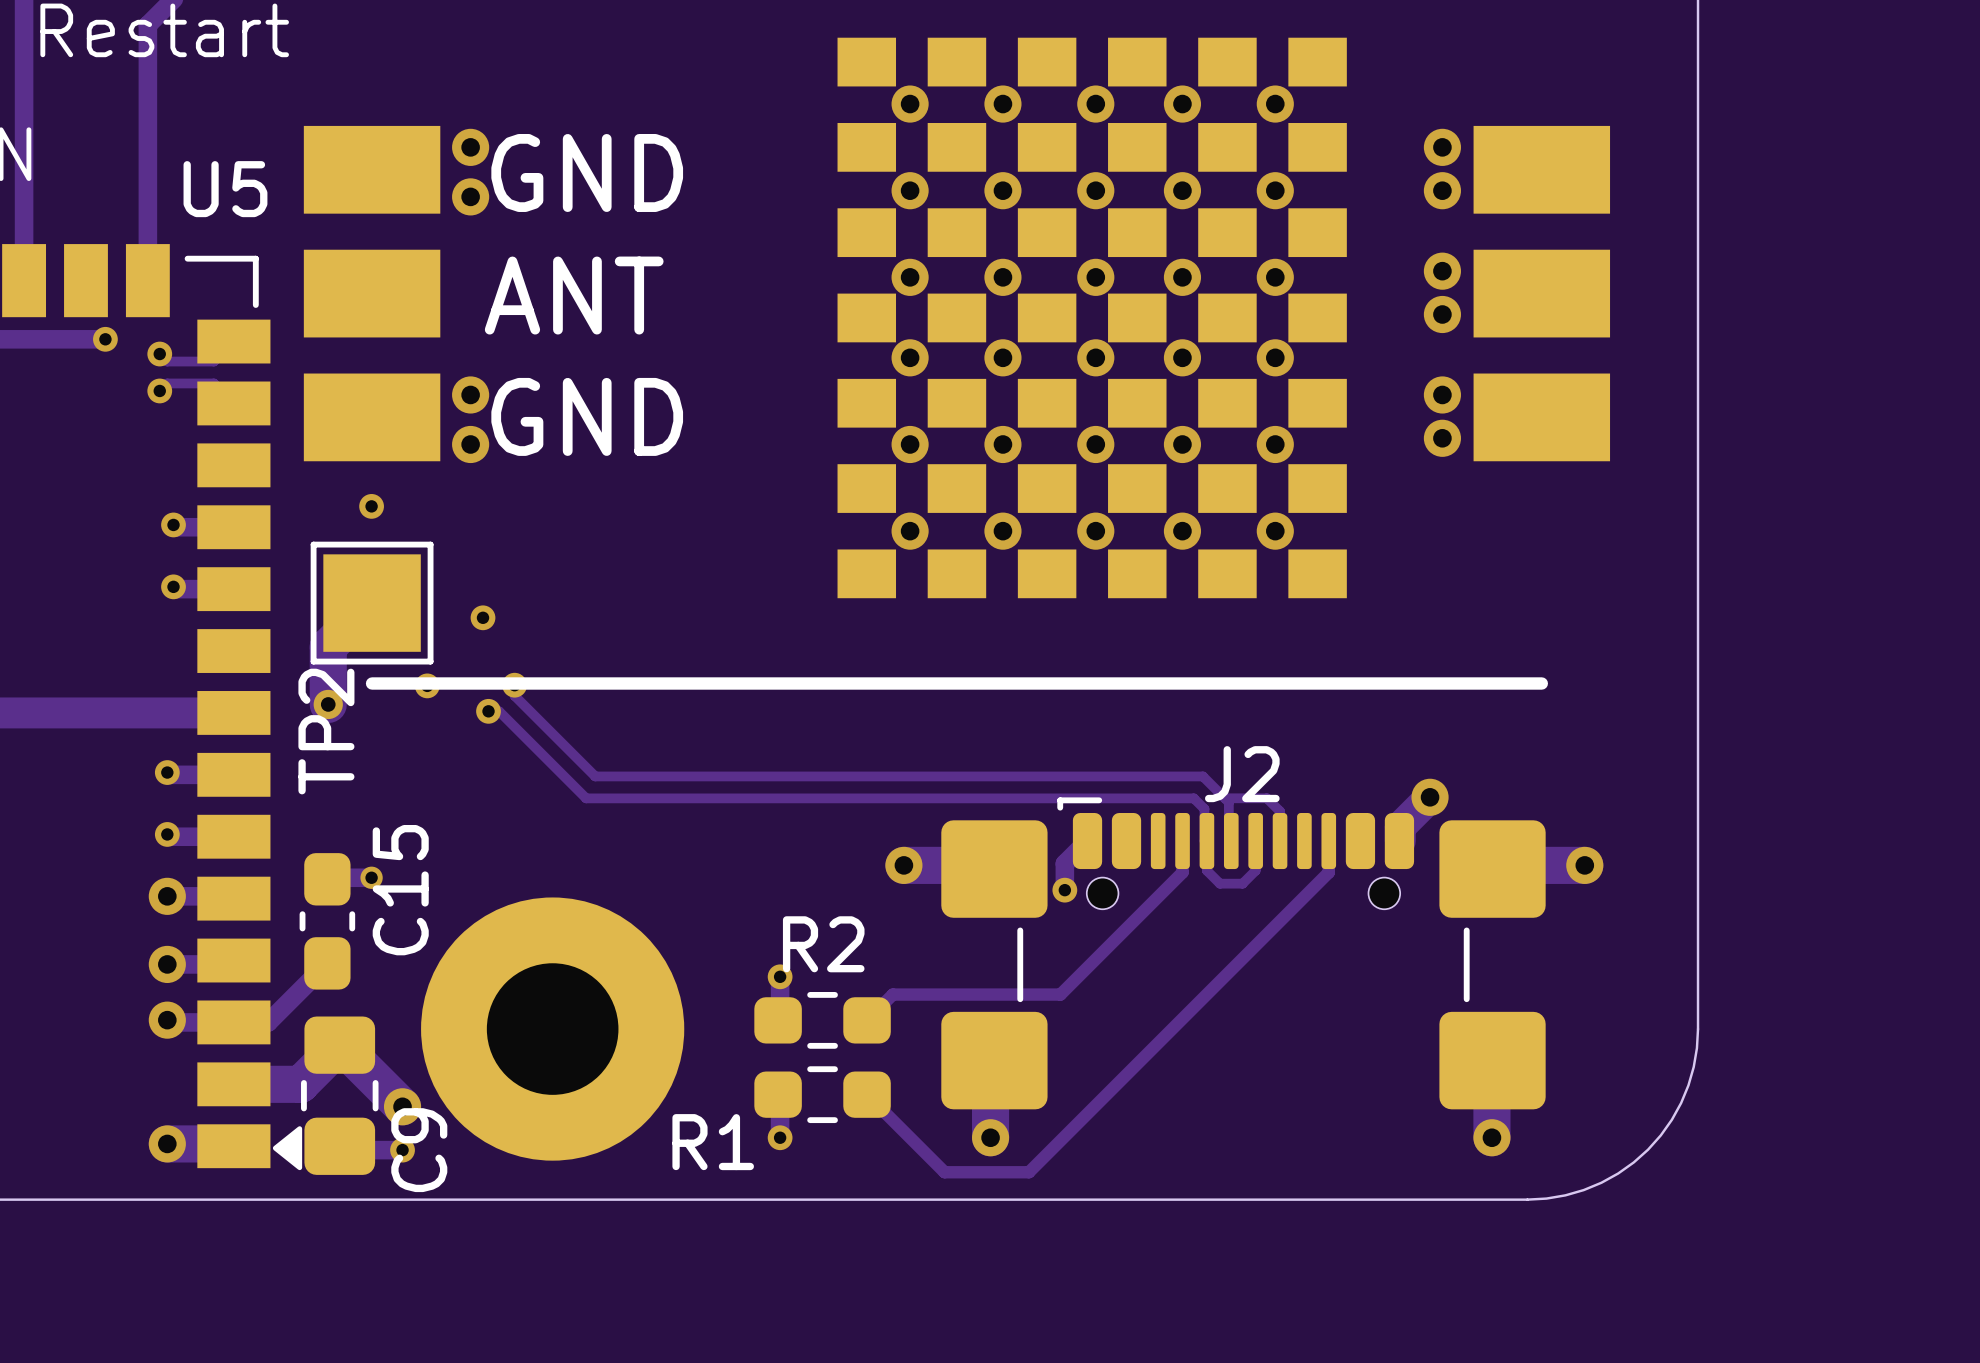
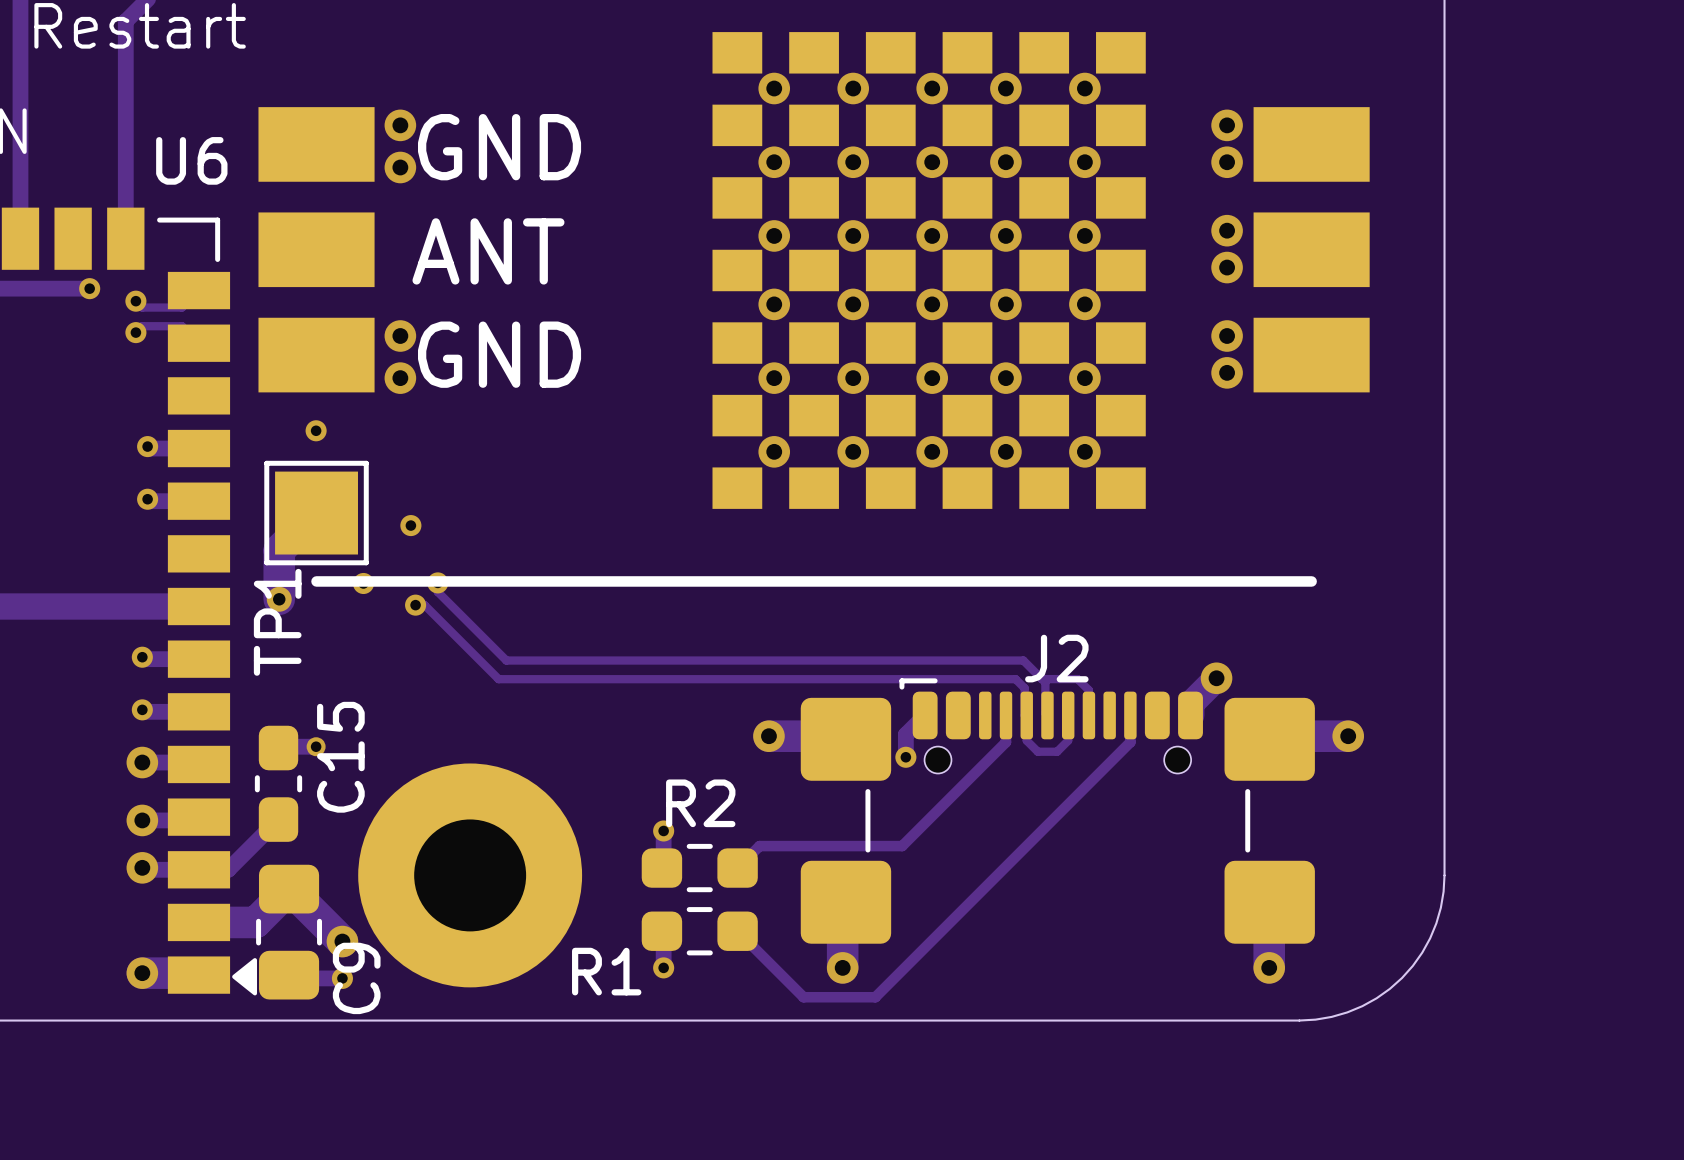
U5 name: U5 (225, 189) -> U6 (191, 160)
TP2 name: TP2 (326, 731) -> TP1 (277, 622)

